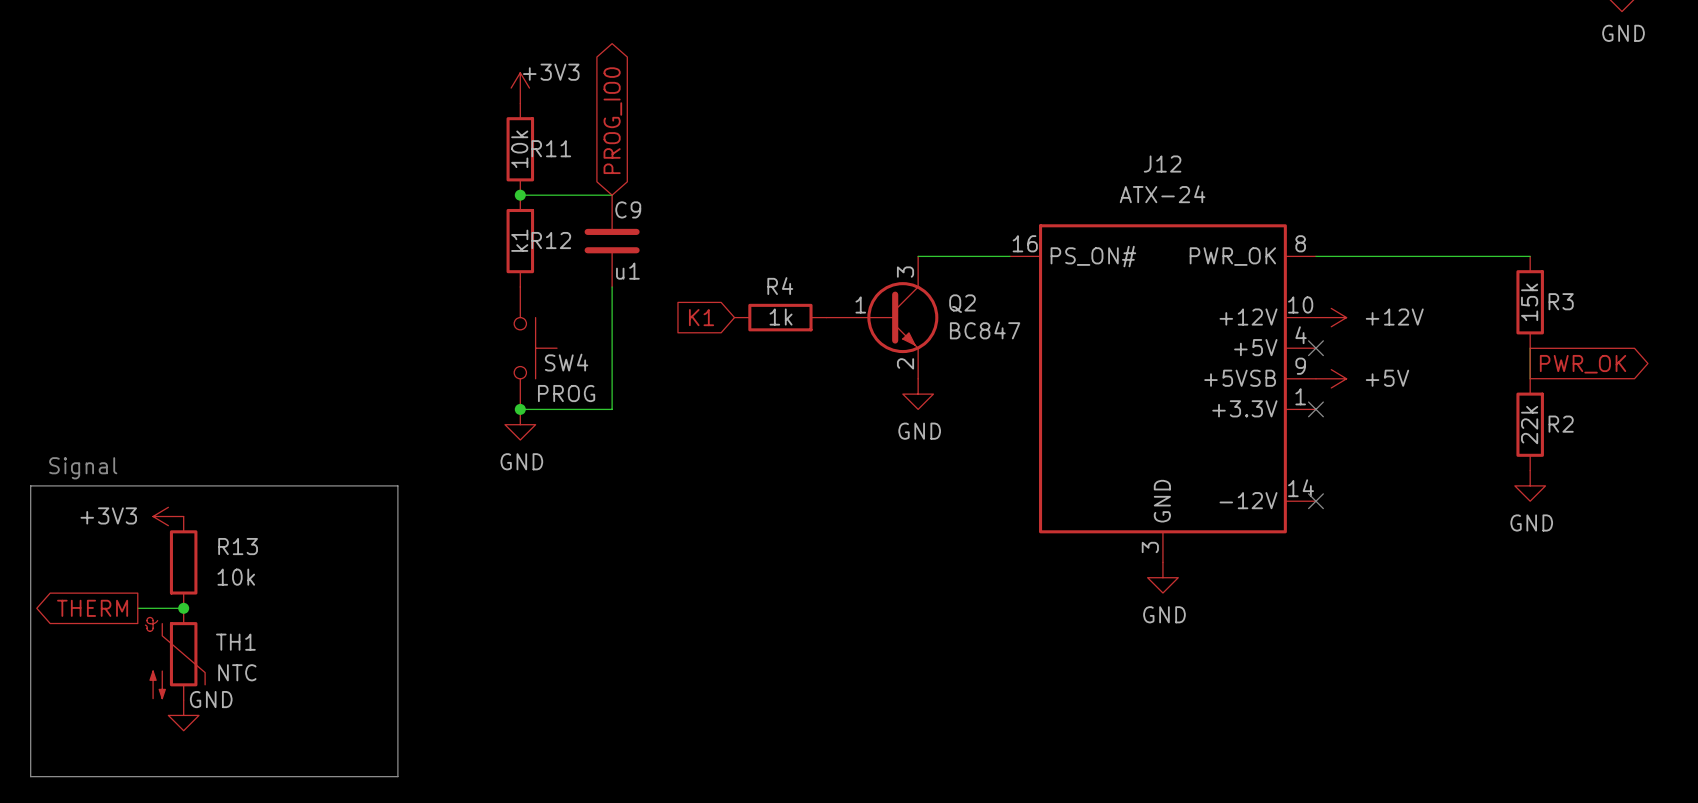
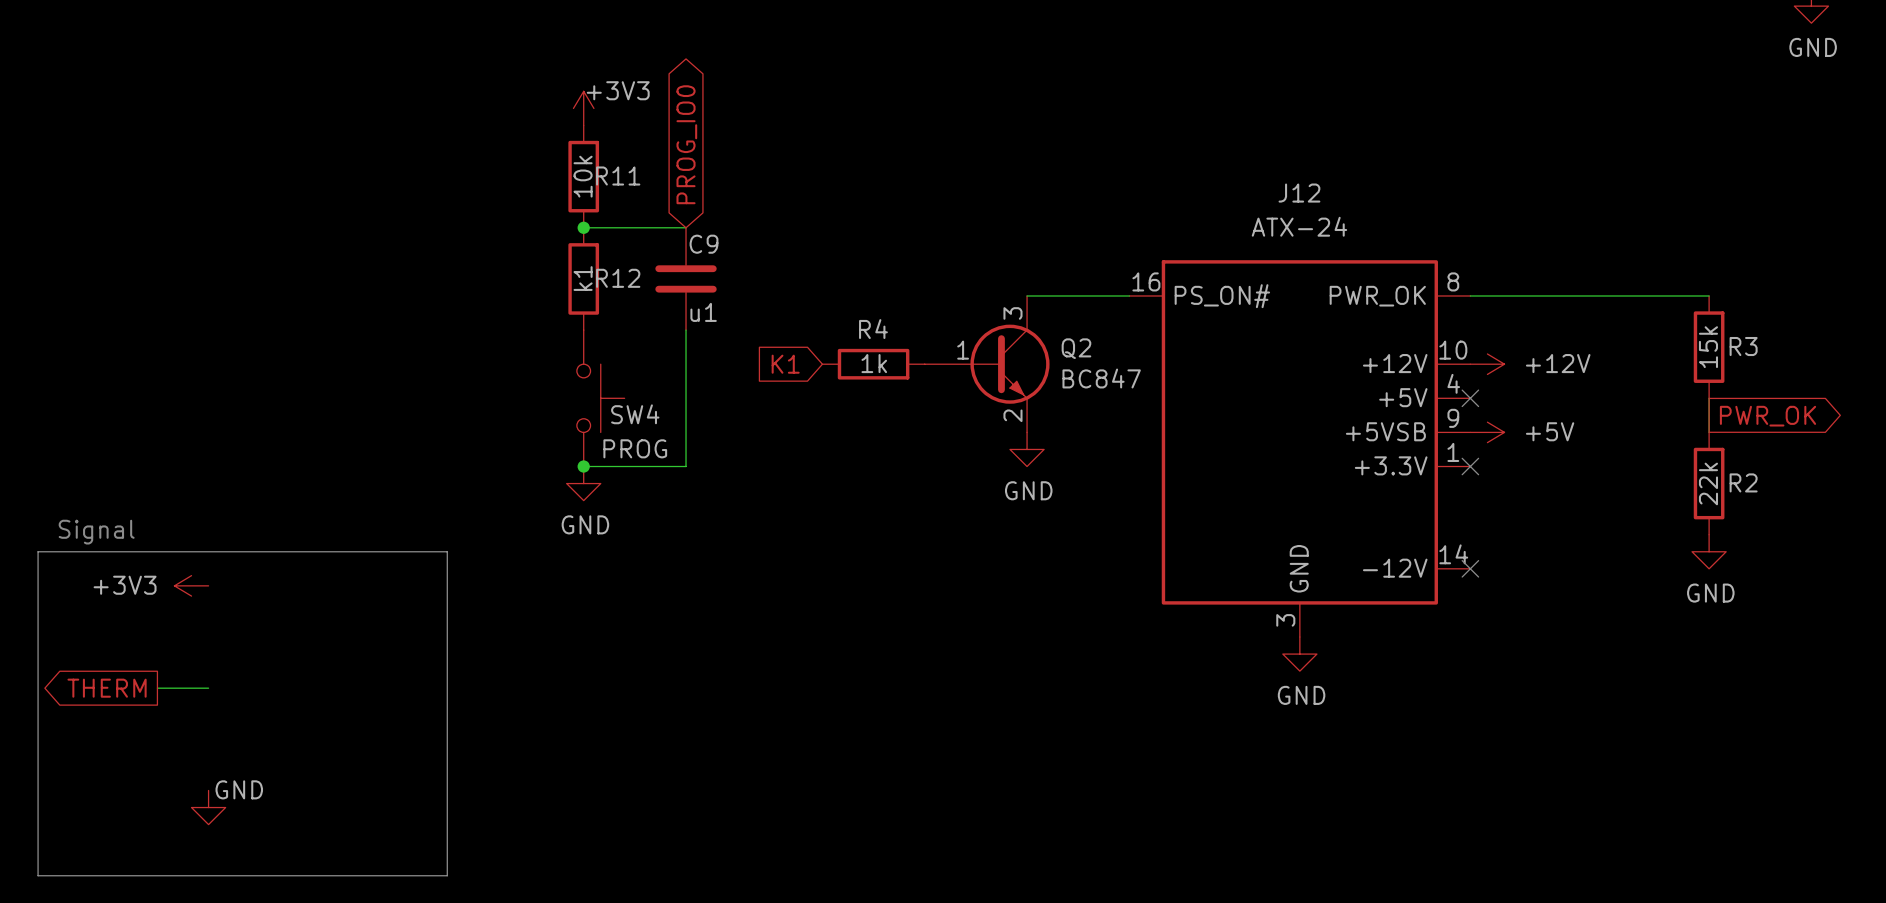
R13: 10k (183, 562) -> none
junction: (183, 608) -> none
TH1: NTC (175, 654) -> none

